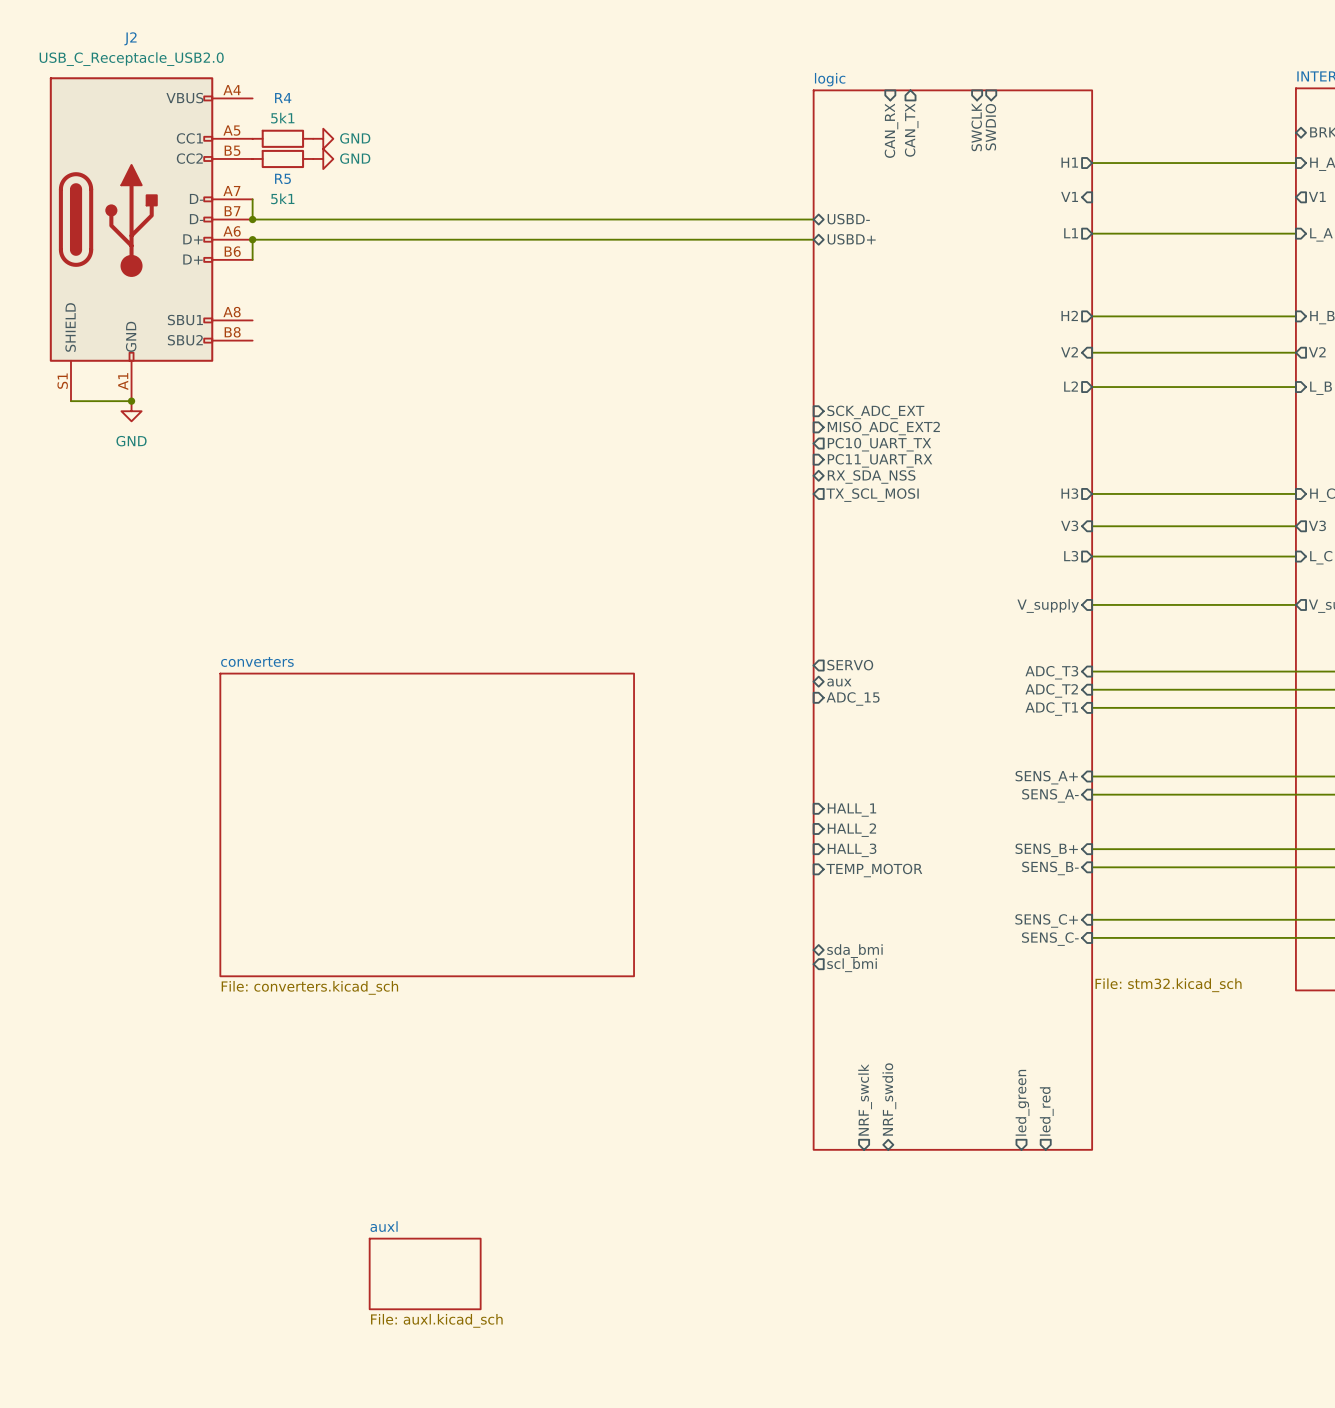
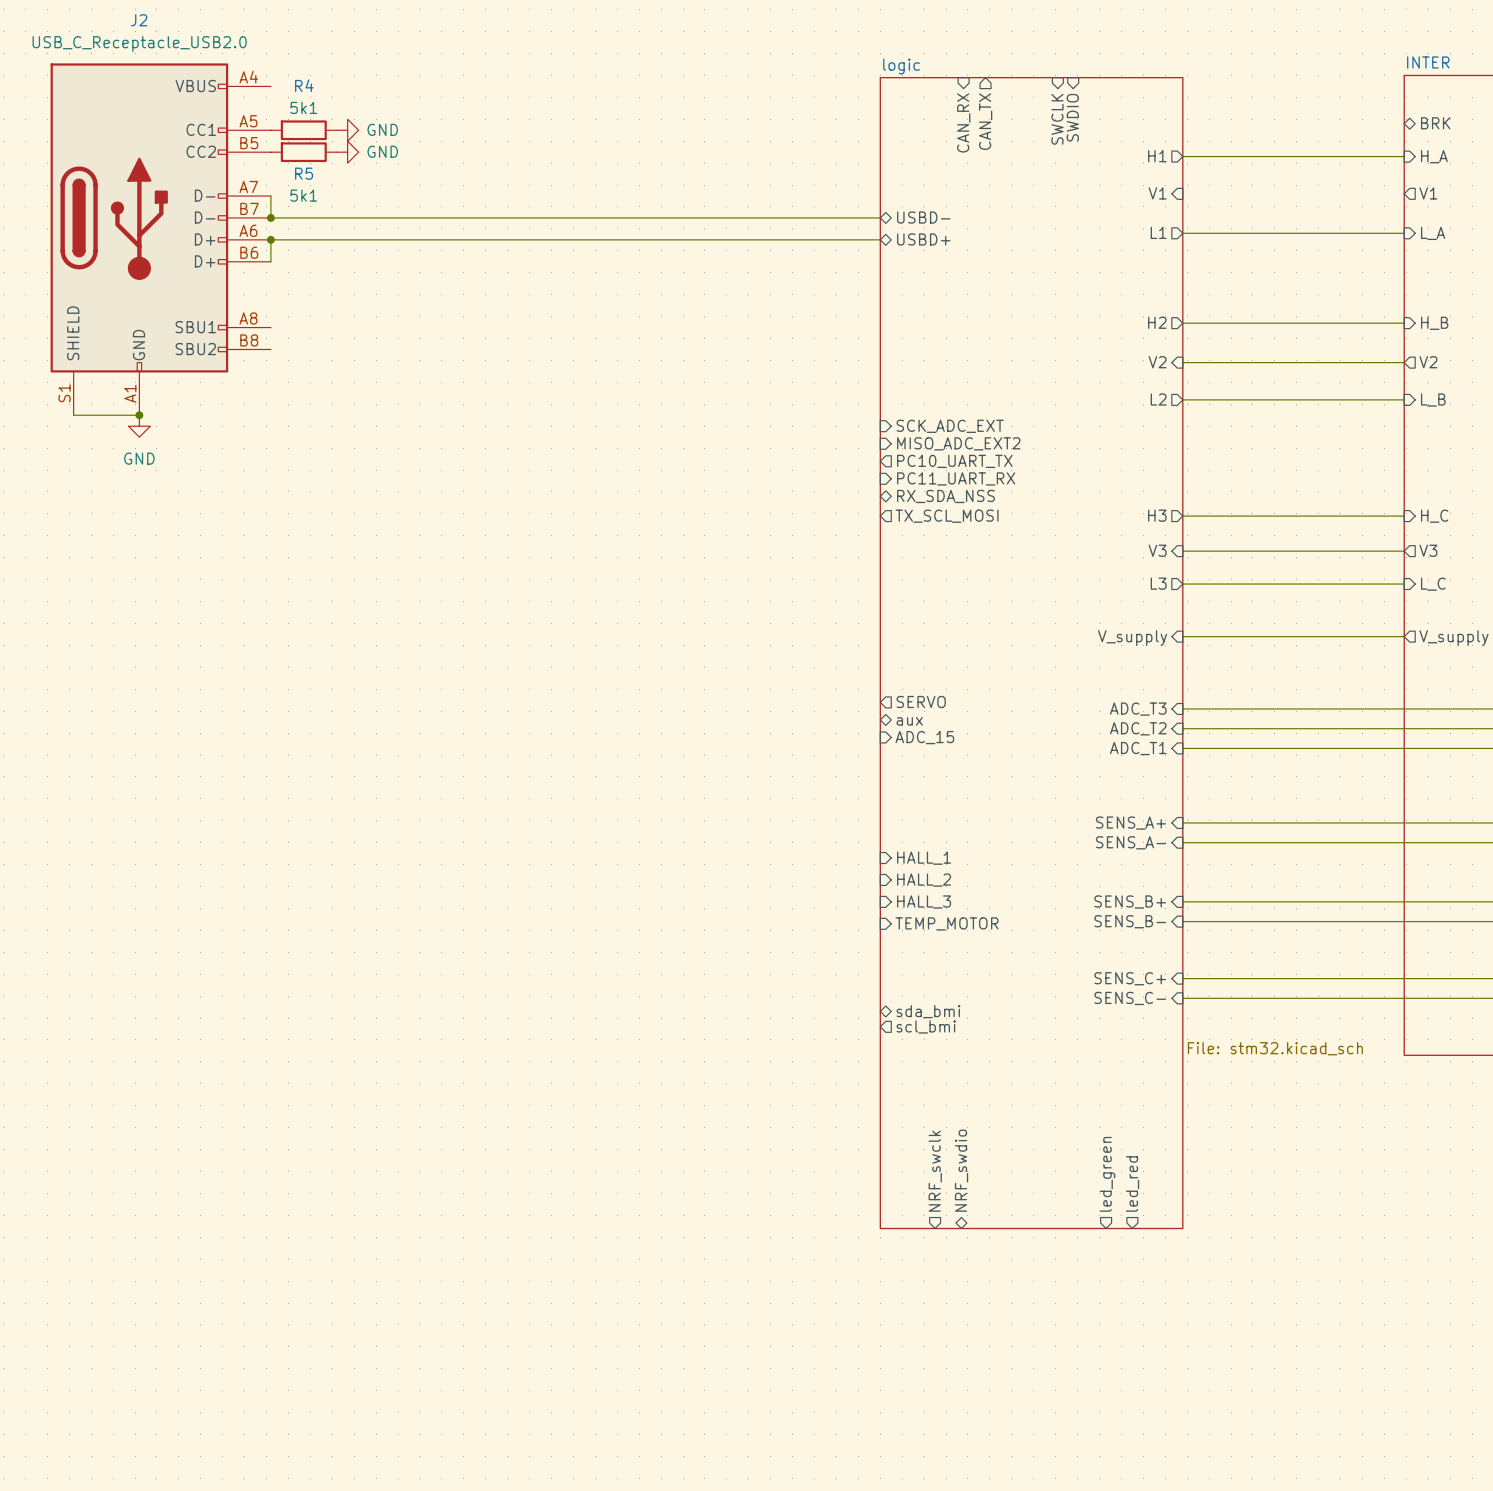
sheet converters: File: converters.kicad_sch (427, 824) -> none
sheet auxl: File: auxl.kicad_sch (425, 1273) -> none

